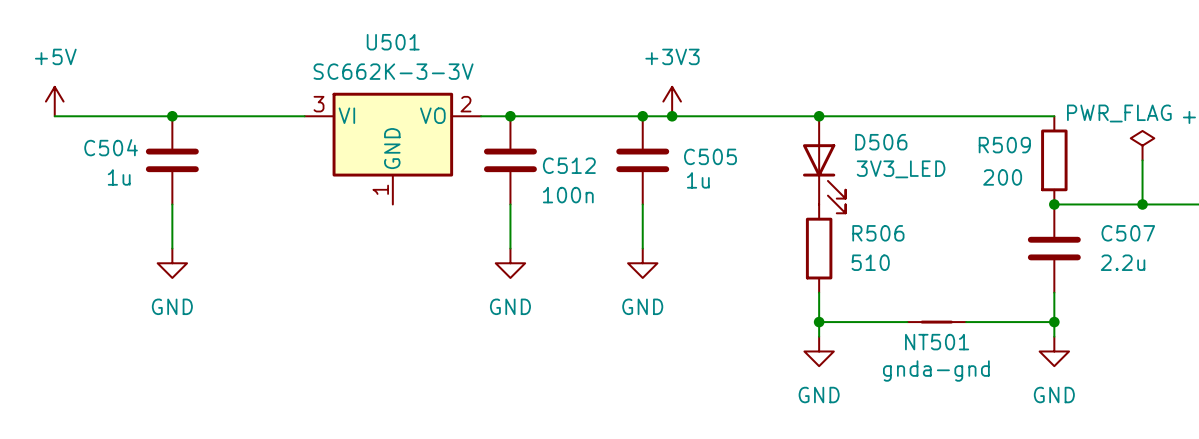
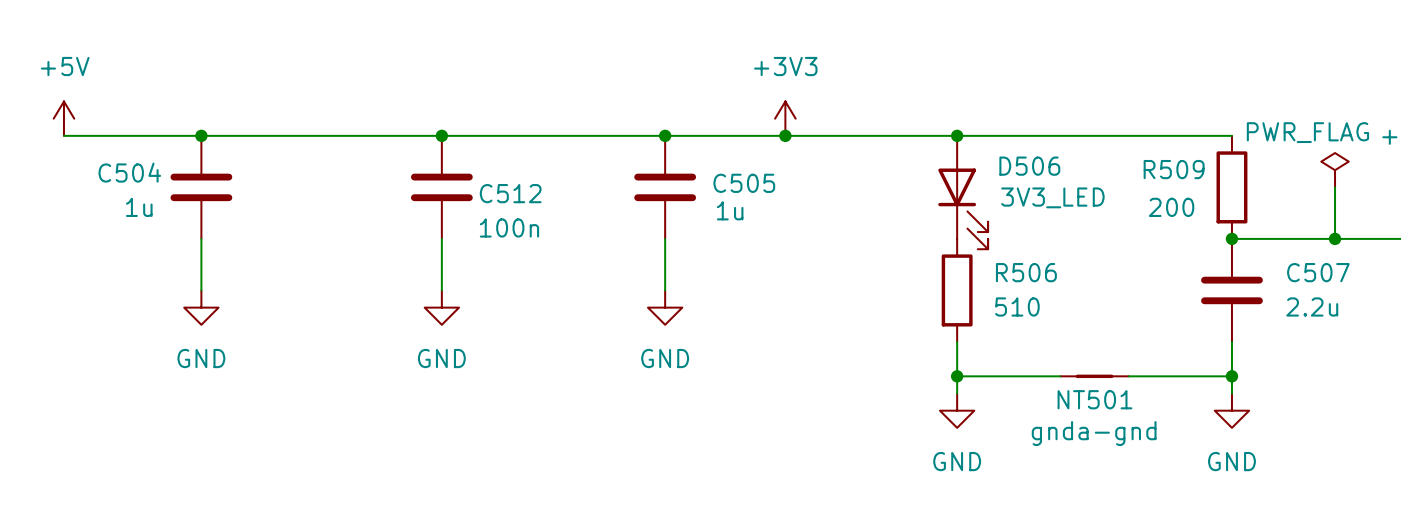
junction: none -> (441, 135)
junction: (510, 116) -> none
junction: none -> (665, 135)
junction: (642, 116) -> none
U501: SC662K-3-3V (392, 148) -> none
C512 position: (510, 160) -> (441, 187)
C505 position: (642, 160) -> (665, 187)
wire: (510, 204) (510, 248) -> (665, 238) (665, 290)
wire: (642, 204) (642, 248) -> (441, 238) (441, 290)
power symbol: none -> GND (441, 307)
power symbol: GND (510, 263) -> none
power symbol: none -> GND (665, 307)
power symbol: GND (642, 263) -> none

